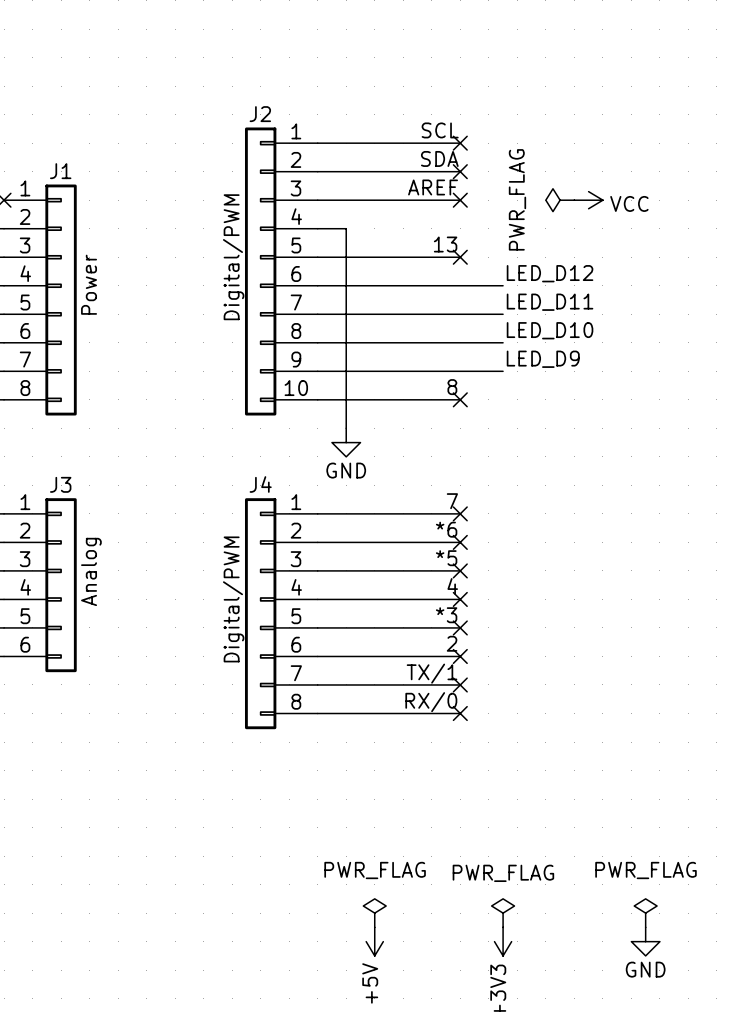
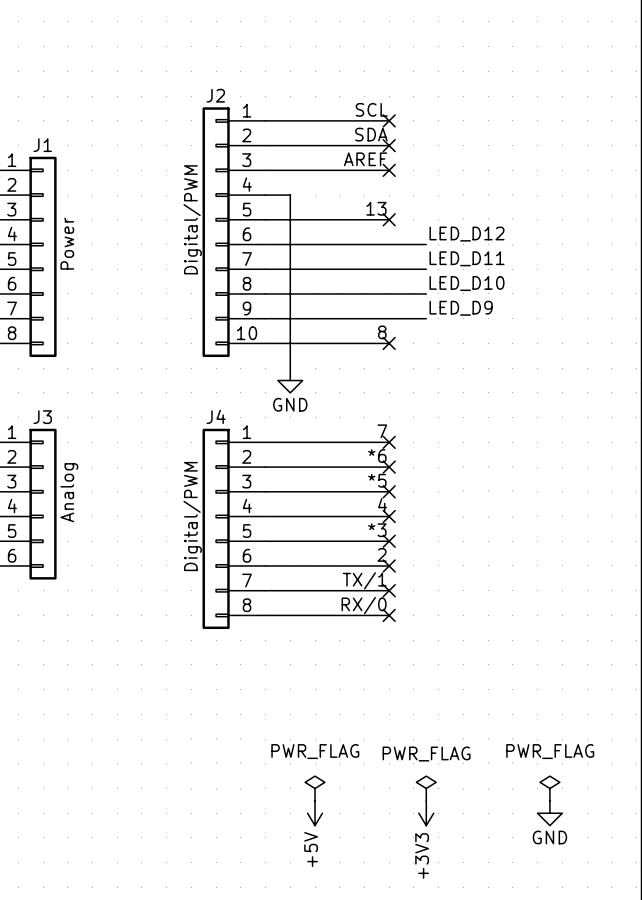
power symbol: PWR_FLAG (560, 200) -> none
power symbol: VCC (588, 200) -> none

